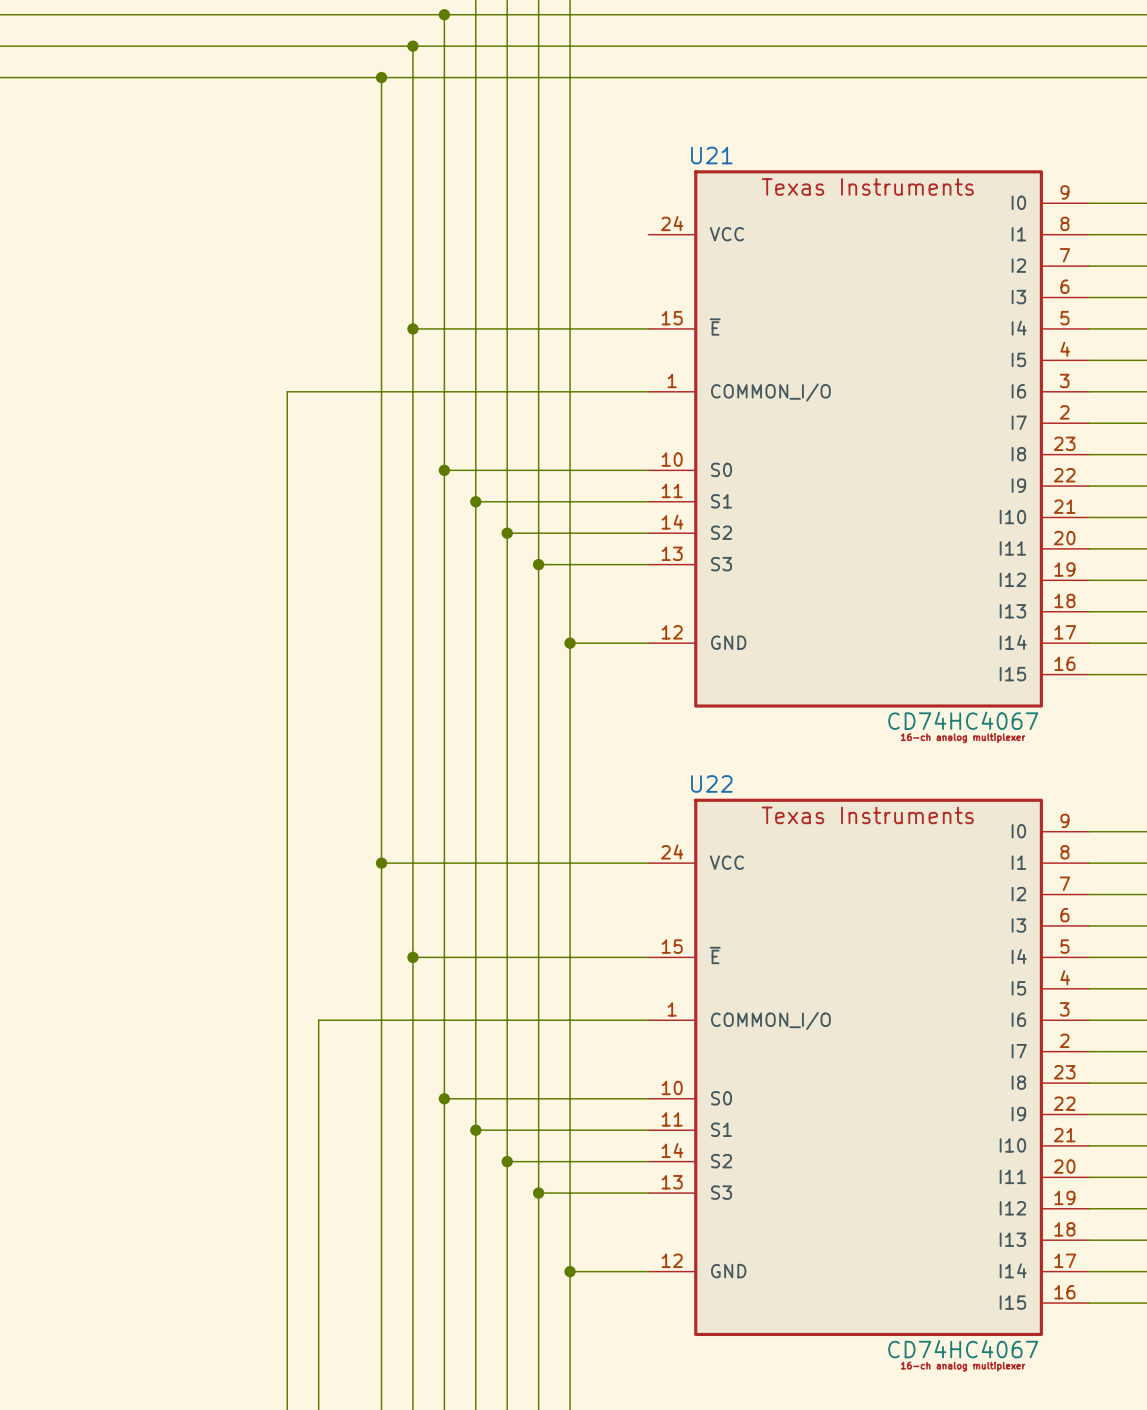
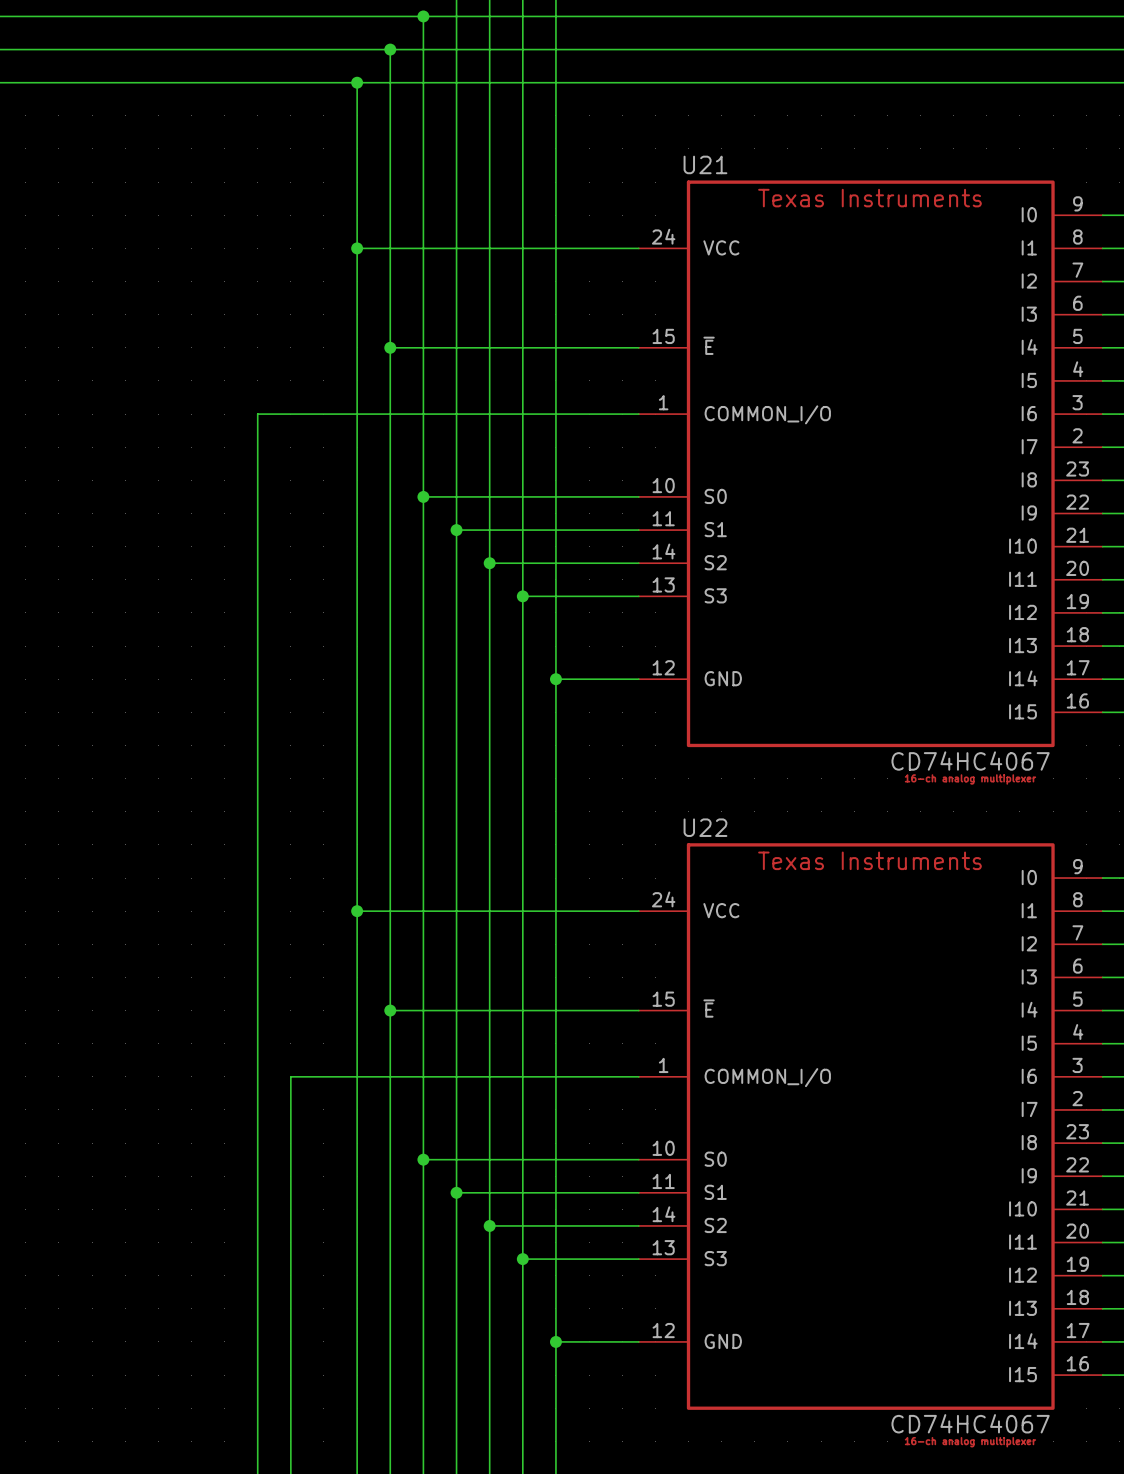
wire: none -> (357, 248) (638, 248)
junction: none -> (357, 248)

